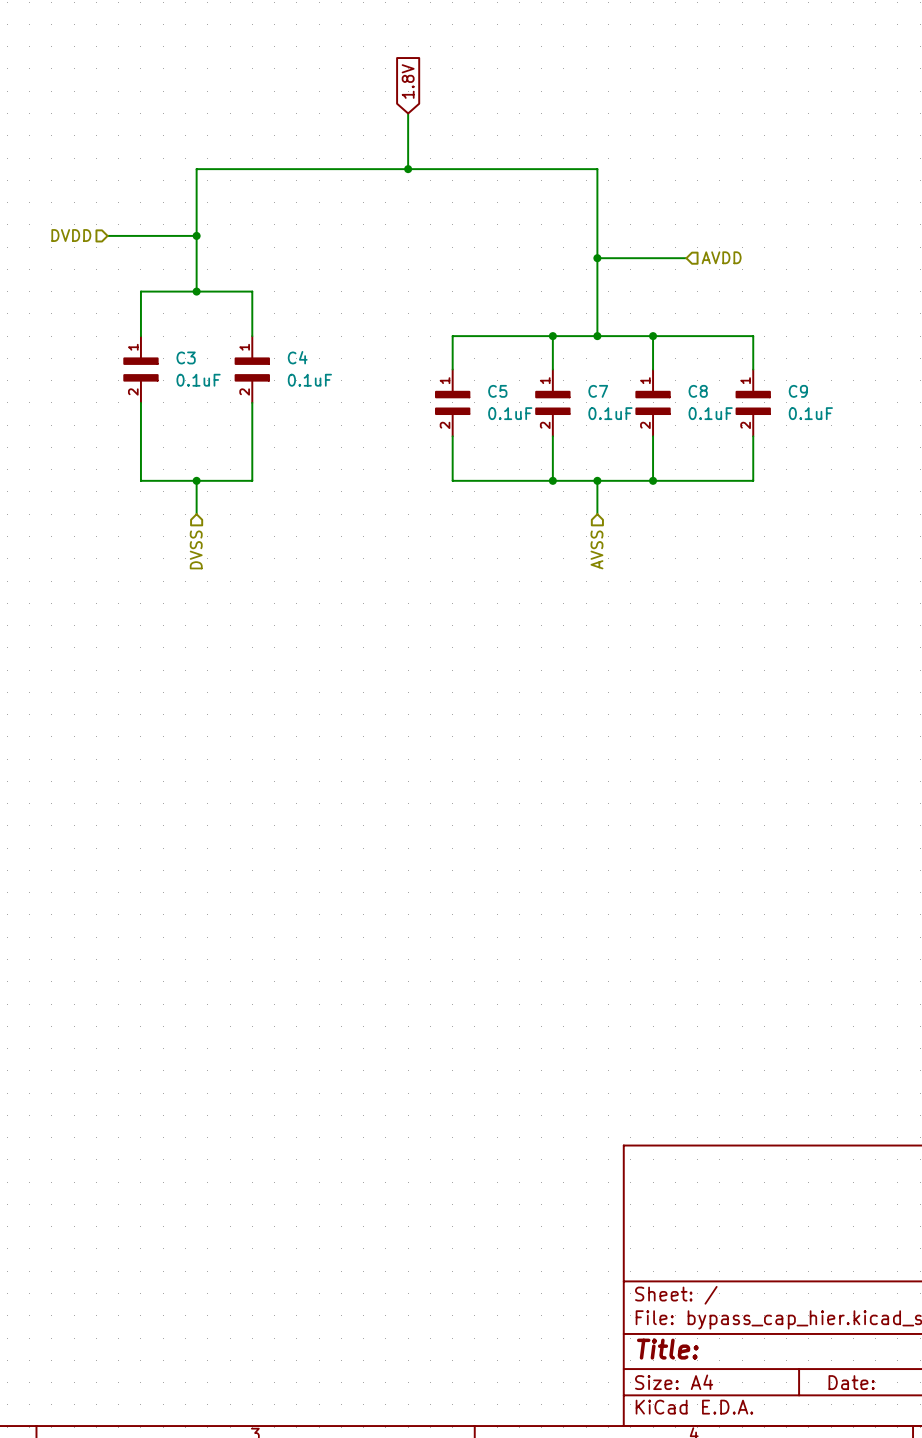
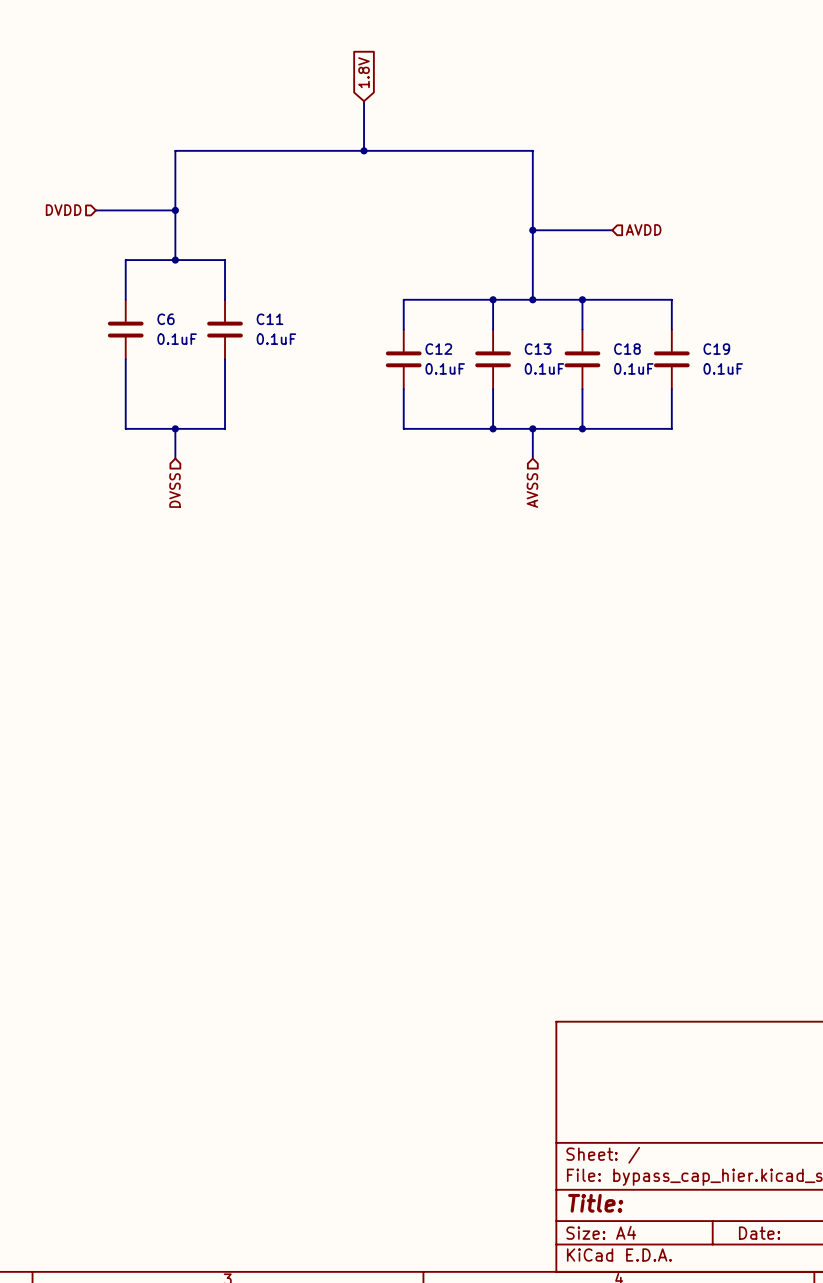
C3: 0.1uF (140, 369) -> none
C6: none -> 0.1uF (125, 329)
C4: 0.1uF (252, 369) -> none
C11: none -> 0.1uF (225, 329)
C5: 0.1uF (452, 402) -> none
C12: none -> 0.1uF (403, 359)
C7: 0.1uF (552, 402) -> none
C13: none -> 0.1uF (493, 359)
C8: 0.1uF (653, 402) -> none
C18: none -> 0.1uF (582, 359)
C9: 0.1uF (753, 402) -> none
C19: none -> 0.1uF (671, 359)

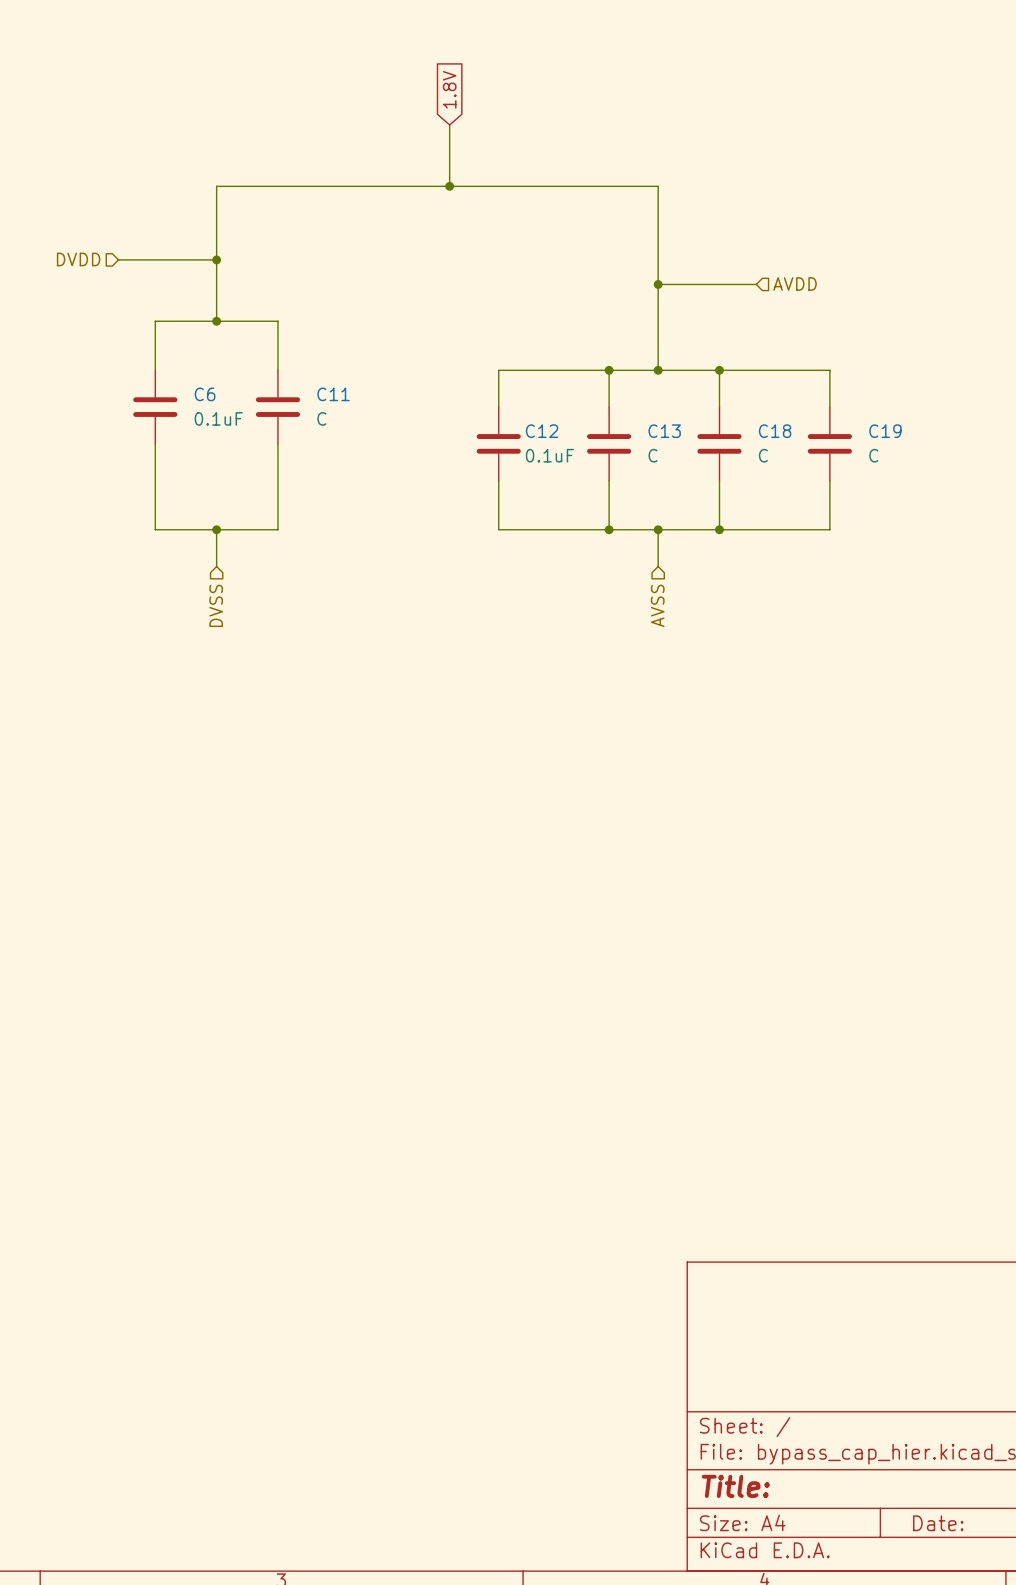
C11 value: 0.1uF (276, 339) -> C (321, 418)
C13 value: 0.1uF (544, 368) -> C (653, 455)
C18 value: 0.1uF (633, 368) -> C (763, 455)
C19 value: 0.1uF (723, 368) -> C (873, 455)

